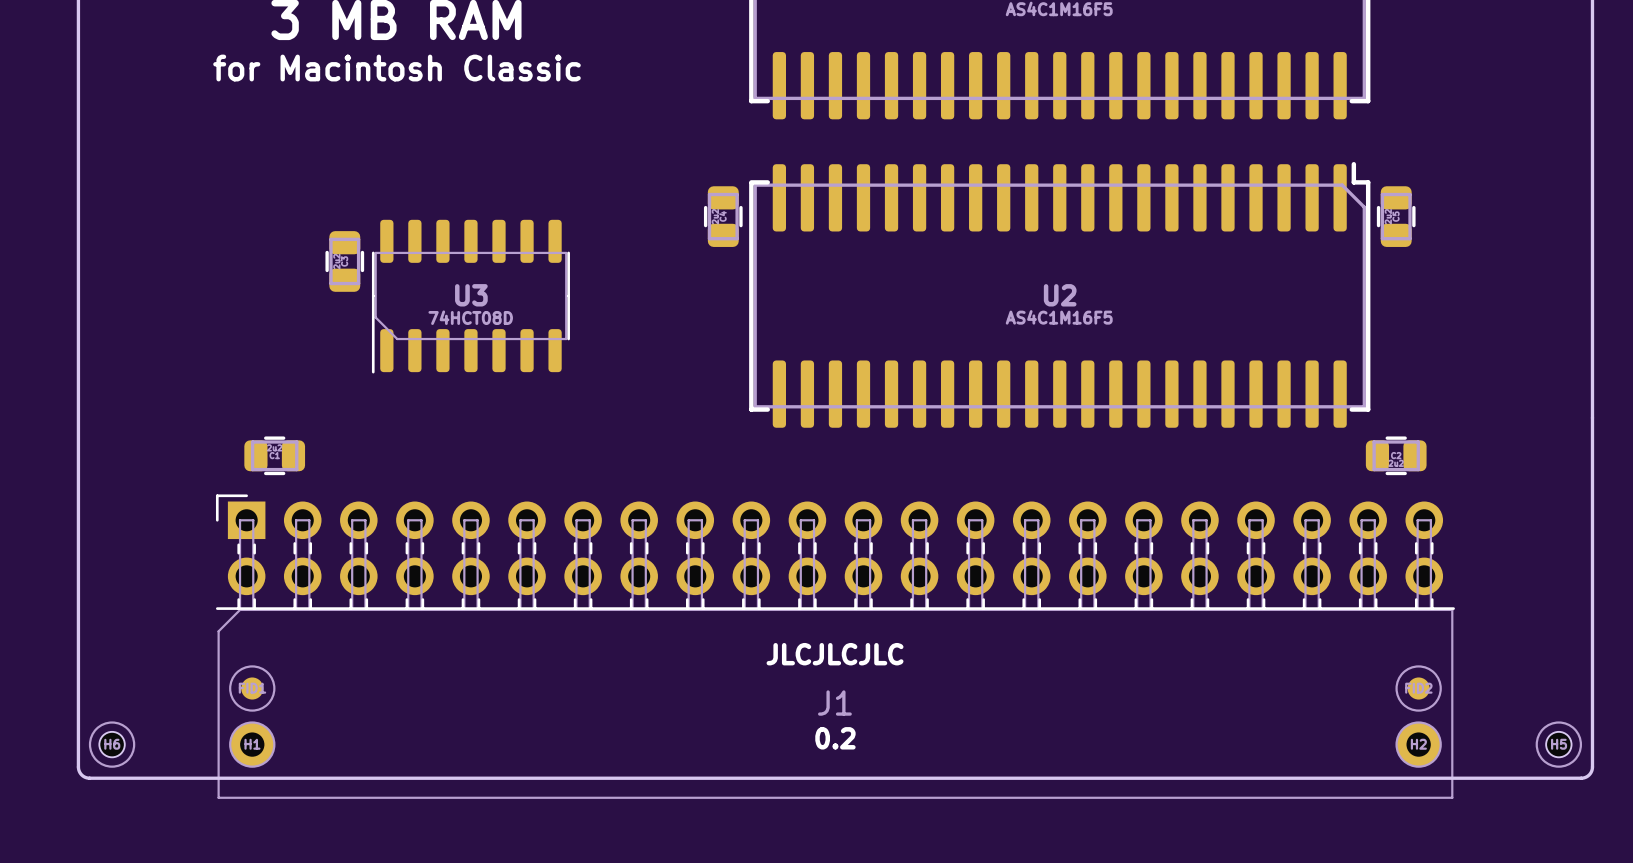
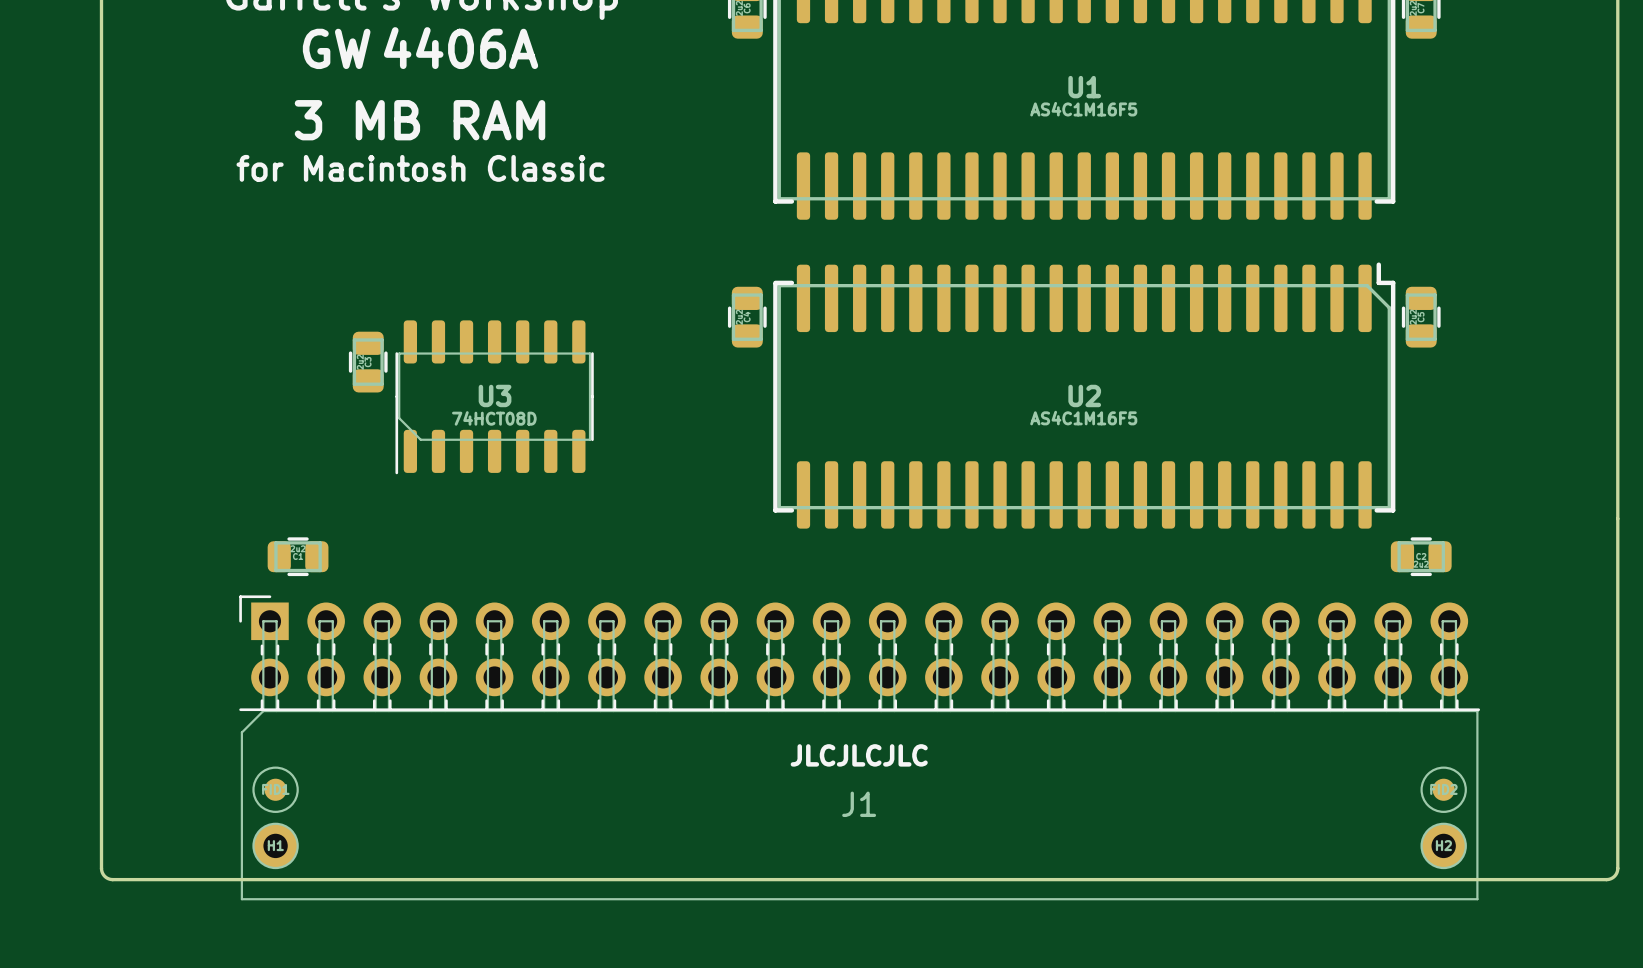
text: 0.2 (835, 738) -> none
H6: (112, 744) -> none
H5: (1558, 744) -> none

